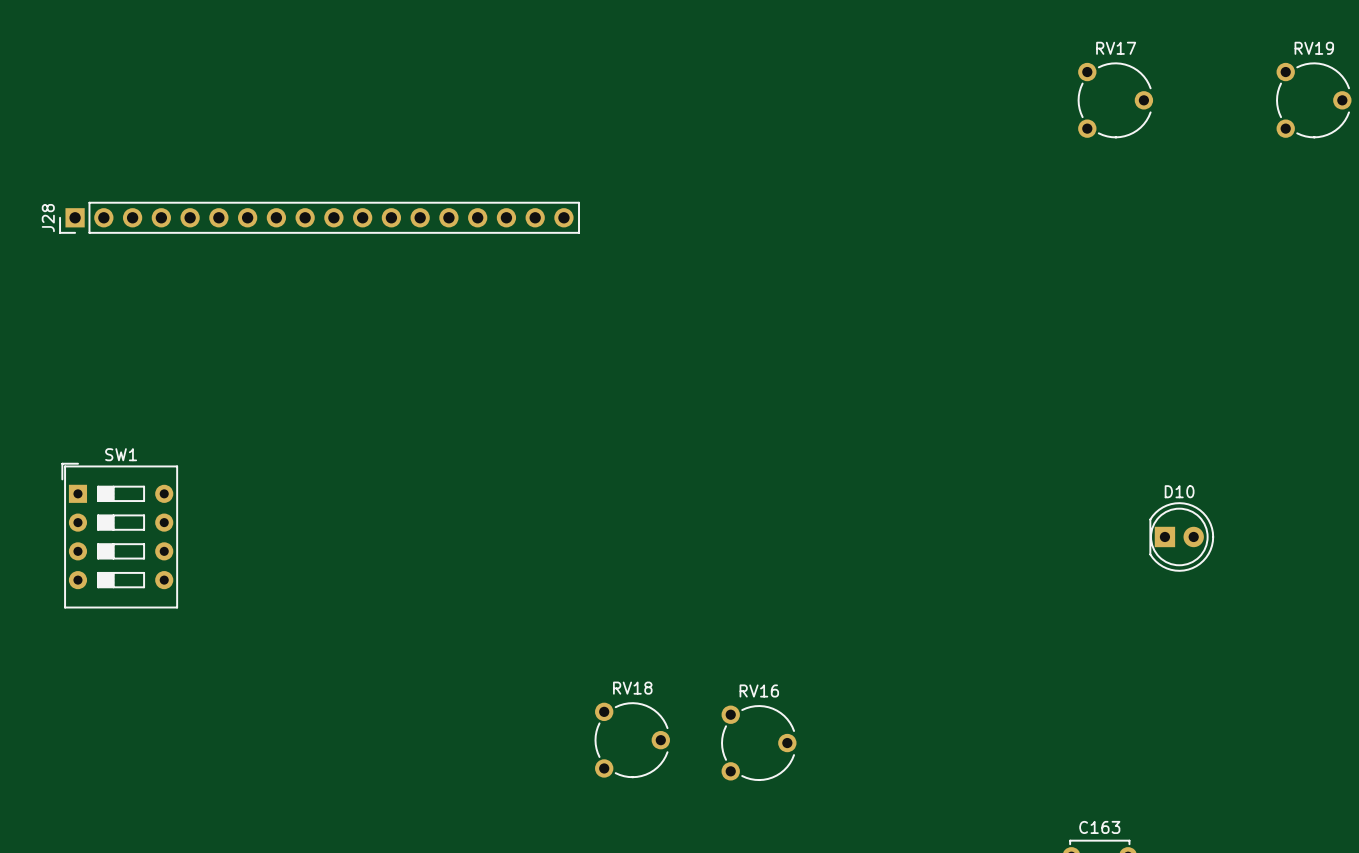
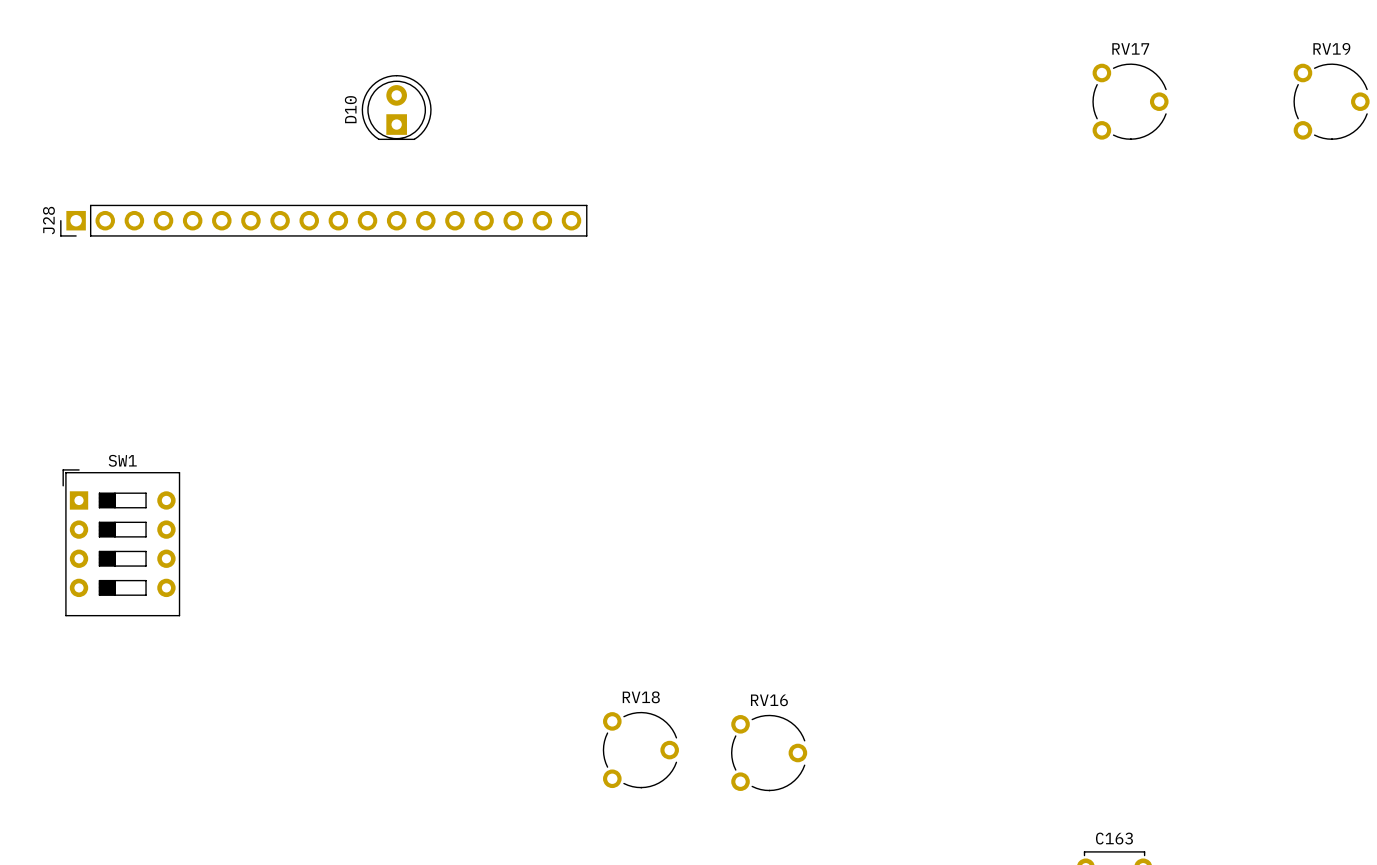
D10 name position: D10 (1179, 491) -> D10 (350, 109)
D10 footprint: [1149, 502, 1214, 572] -> [361, 74, 432, 141]

